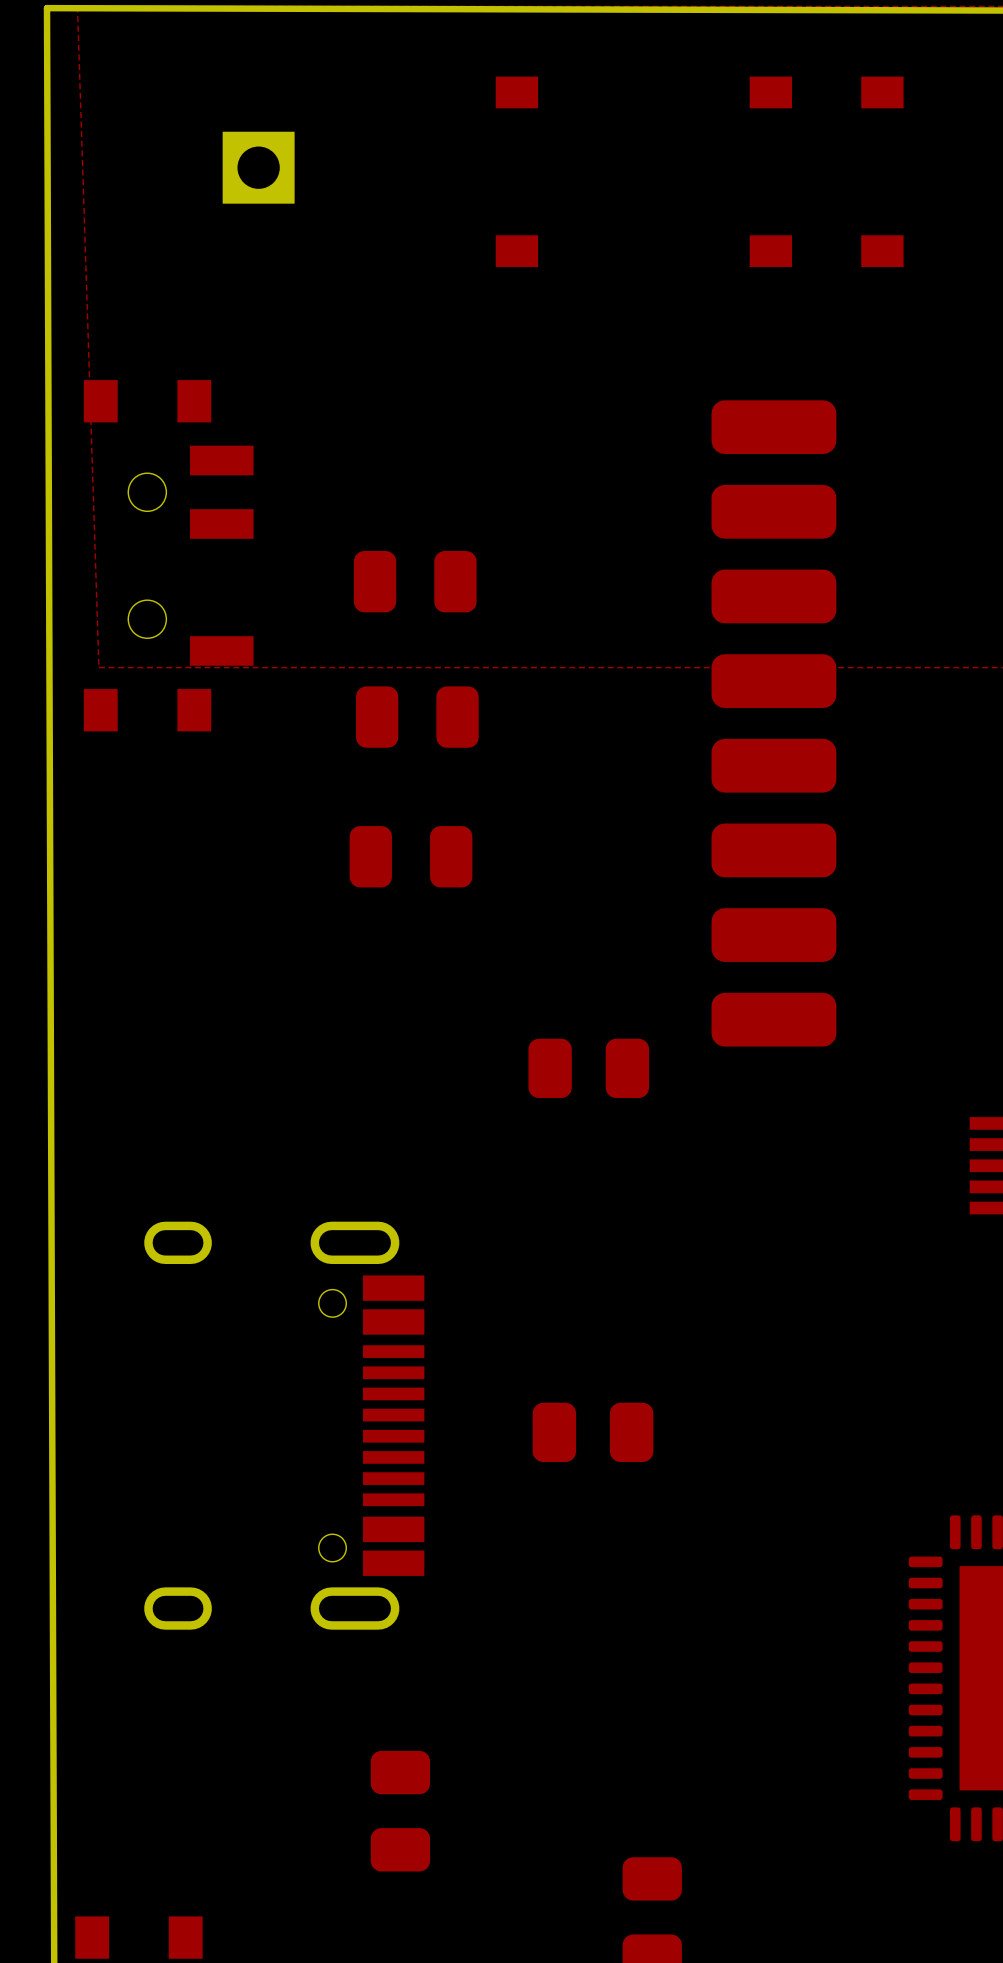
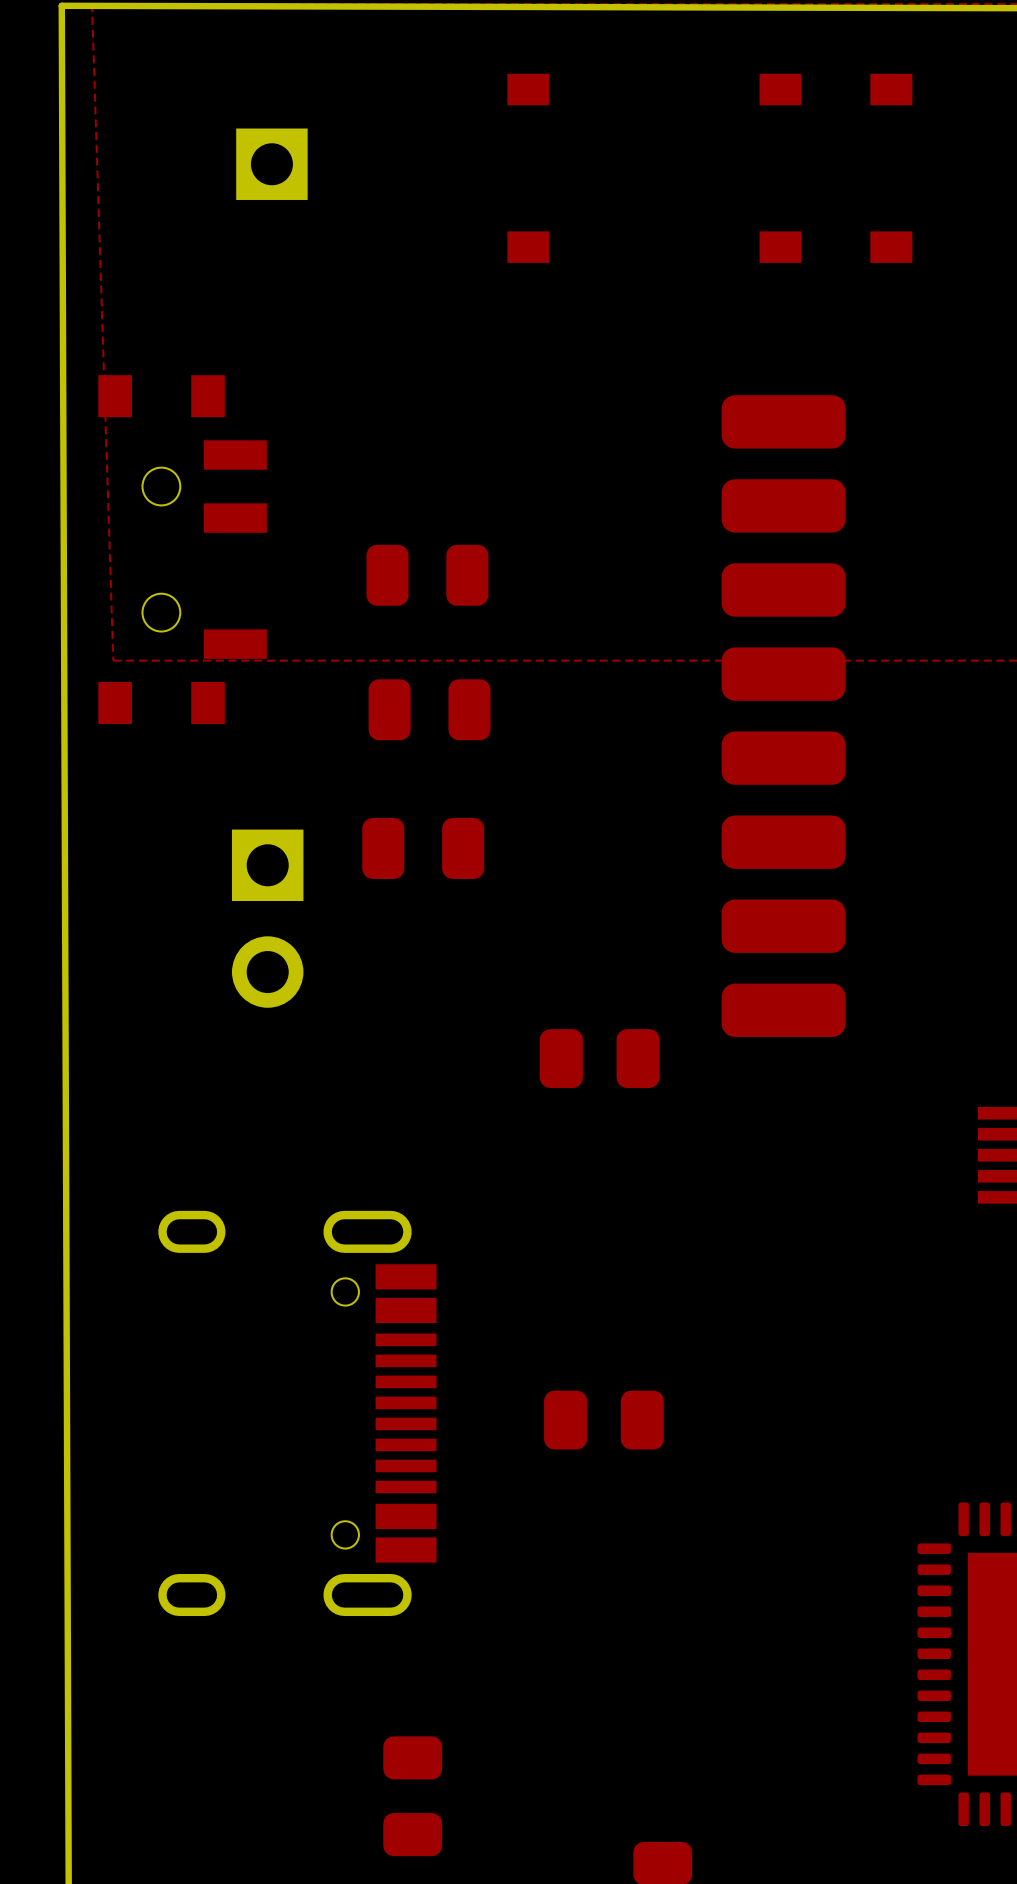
part: none -> (267, 918)

